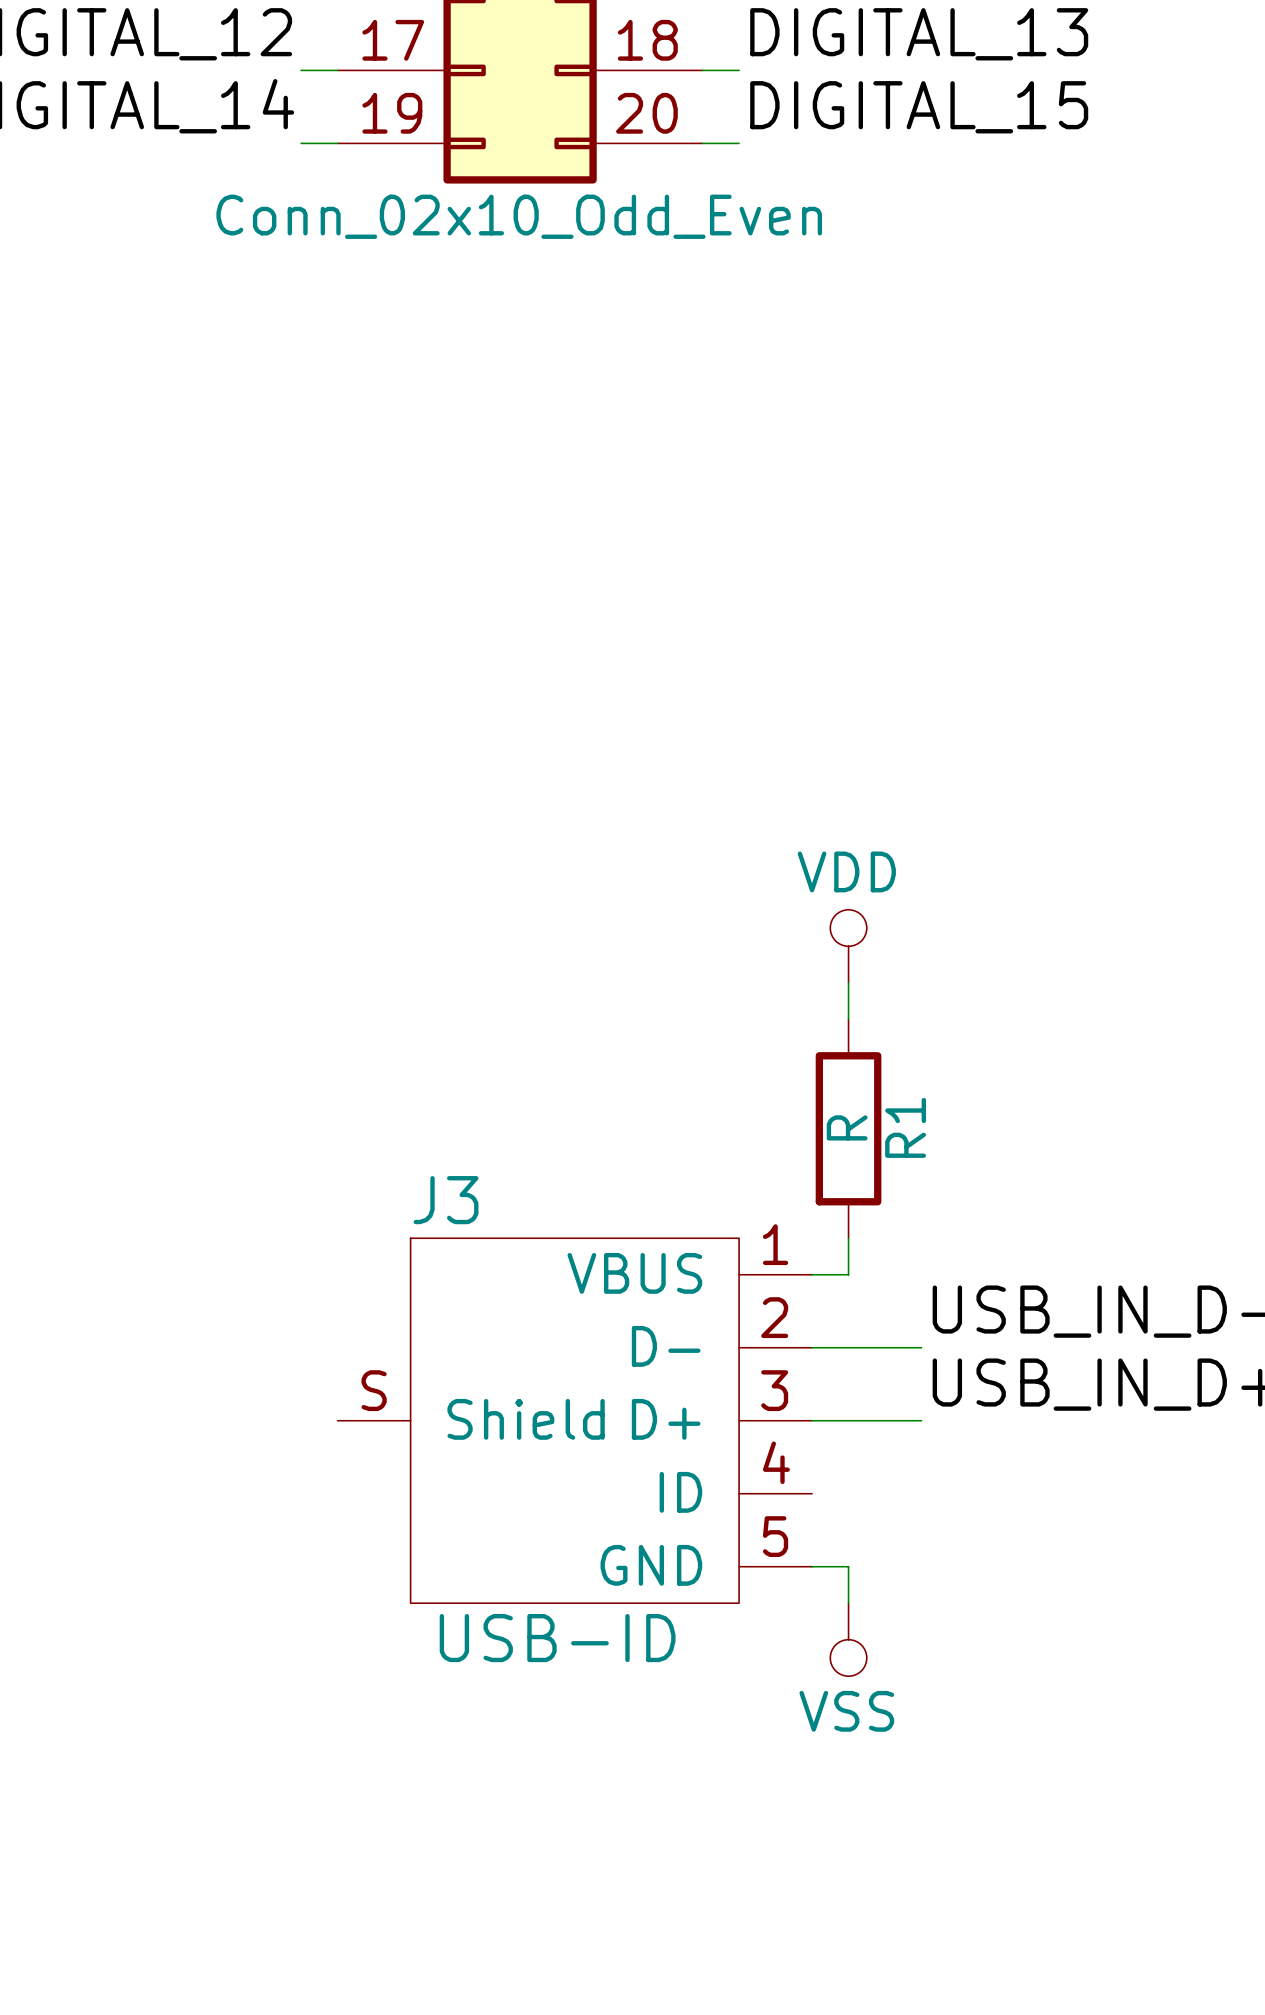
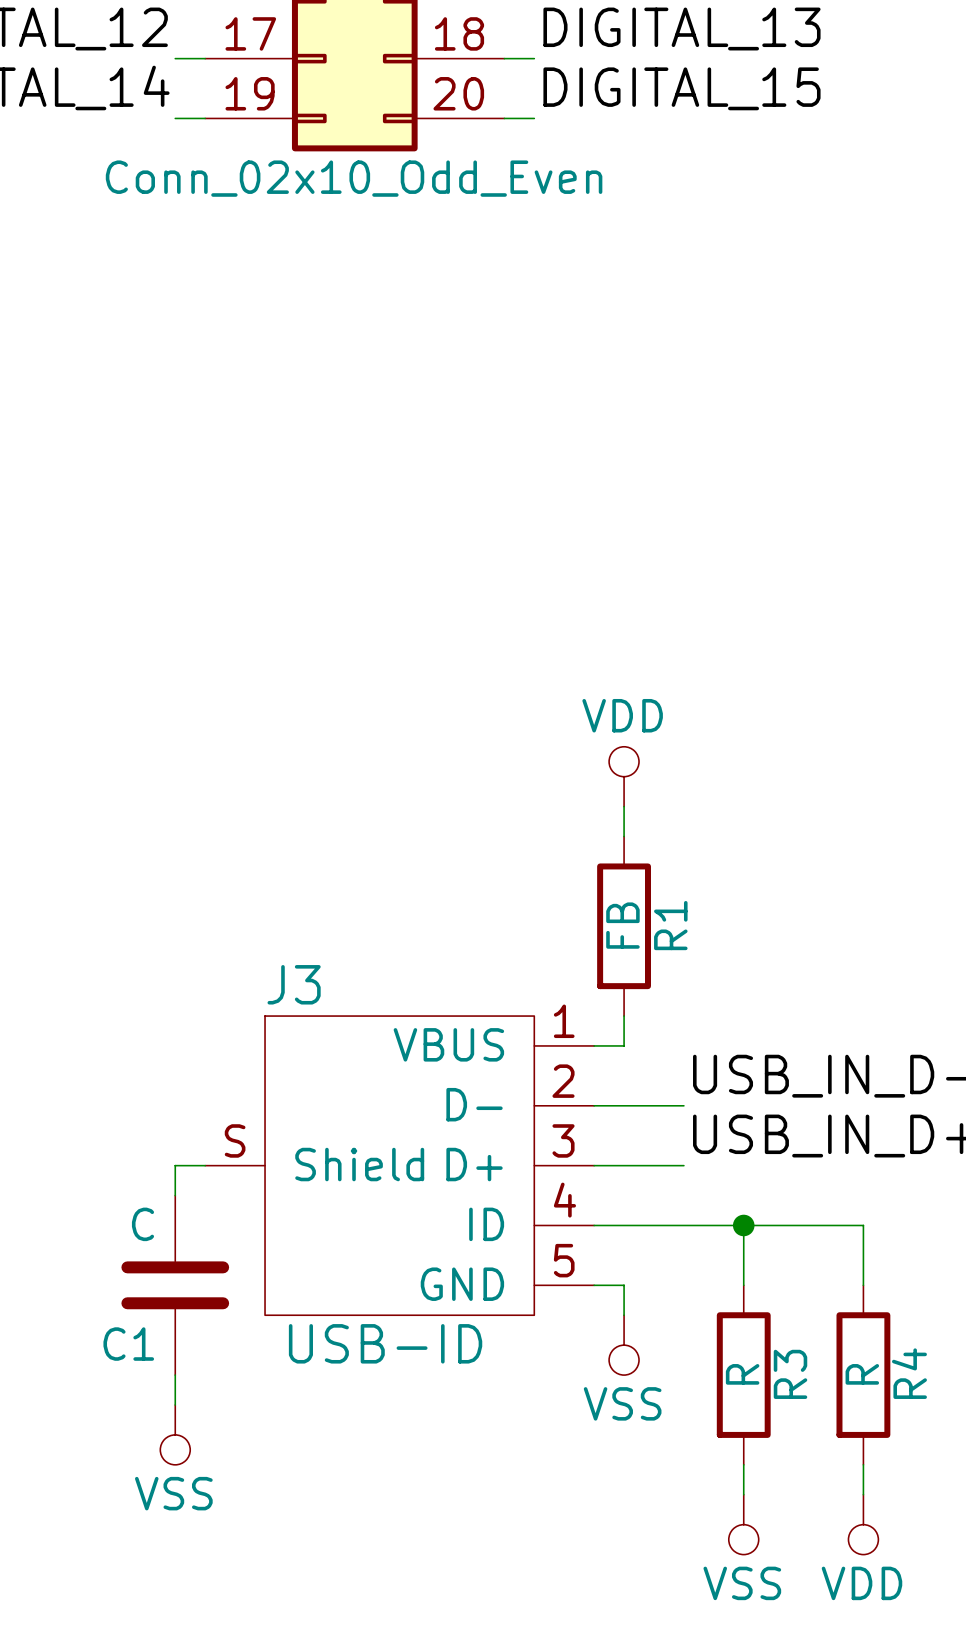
R1 value: R (847, 1127) -> FB (622, 925)
wire: none -> (205, 1165) (175, 1165) (175, 1195)
wire: none -> (594, 1225) (863, 1225) (863, 1285)
wire: none -> (743, 1225) (743, 1285)
junction: none -> (743, 1225)
C1: none -> C (175, 1285)
wire: none -> (175, 1375) (175, 1405)
R3: none -> R (743, 1375)
R4: none -> R (863, 1375)
power symbol: none -> VSS (175, 1434)
wire: none -> (743, 1464) (743, 1494)
wire: none -> (863, 1464) (863, 1494)
power symbol: none -> VSS (743, 1524)
power symbol: none -> VDD (863, 1524)

